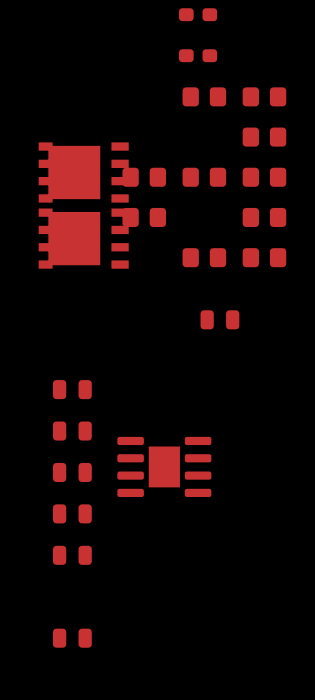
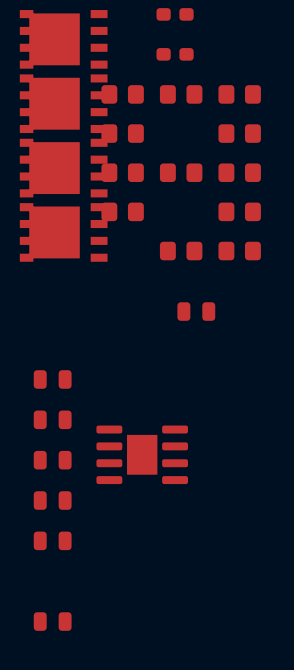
part: none -> (63, 39)
part: none -> (122, 94)
part: none -> (63, 103)
part: none -> (122, 133)

